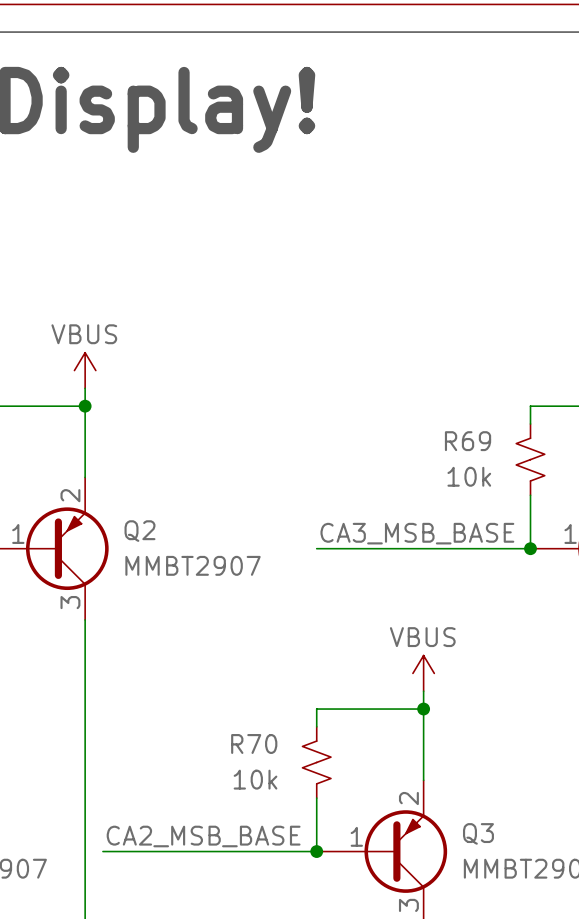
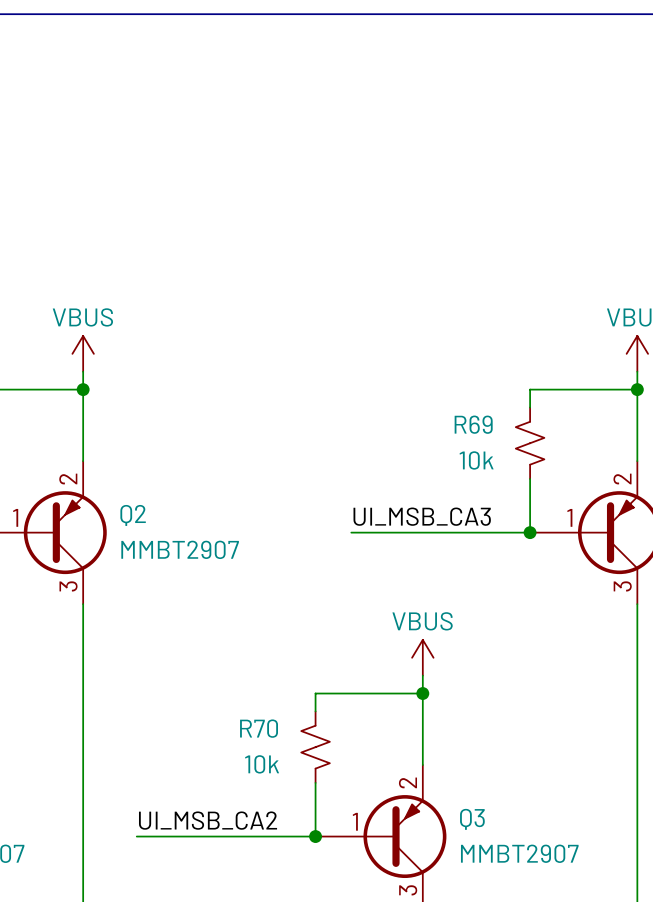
label: CA3_MSB_BASE (417, 533) -> none
label: none -> UI_MSB_CA3 (422, 516)
wire: (316, 548) (352, 548) -> none
label: CA2_MSB_BASE (203, 836) -> none
label: none -> UI_MSB_CA2 (208, 820)
wire: (102, 851) (138, 851) -> none

